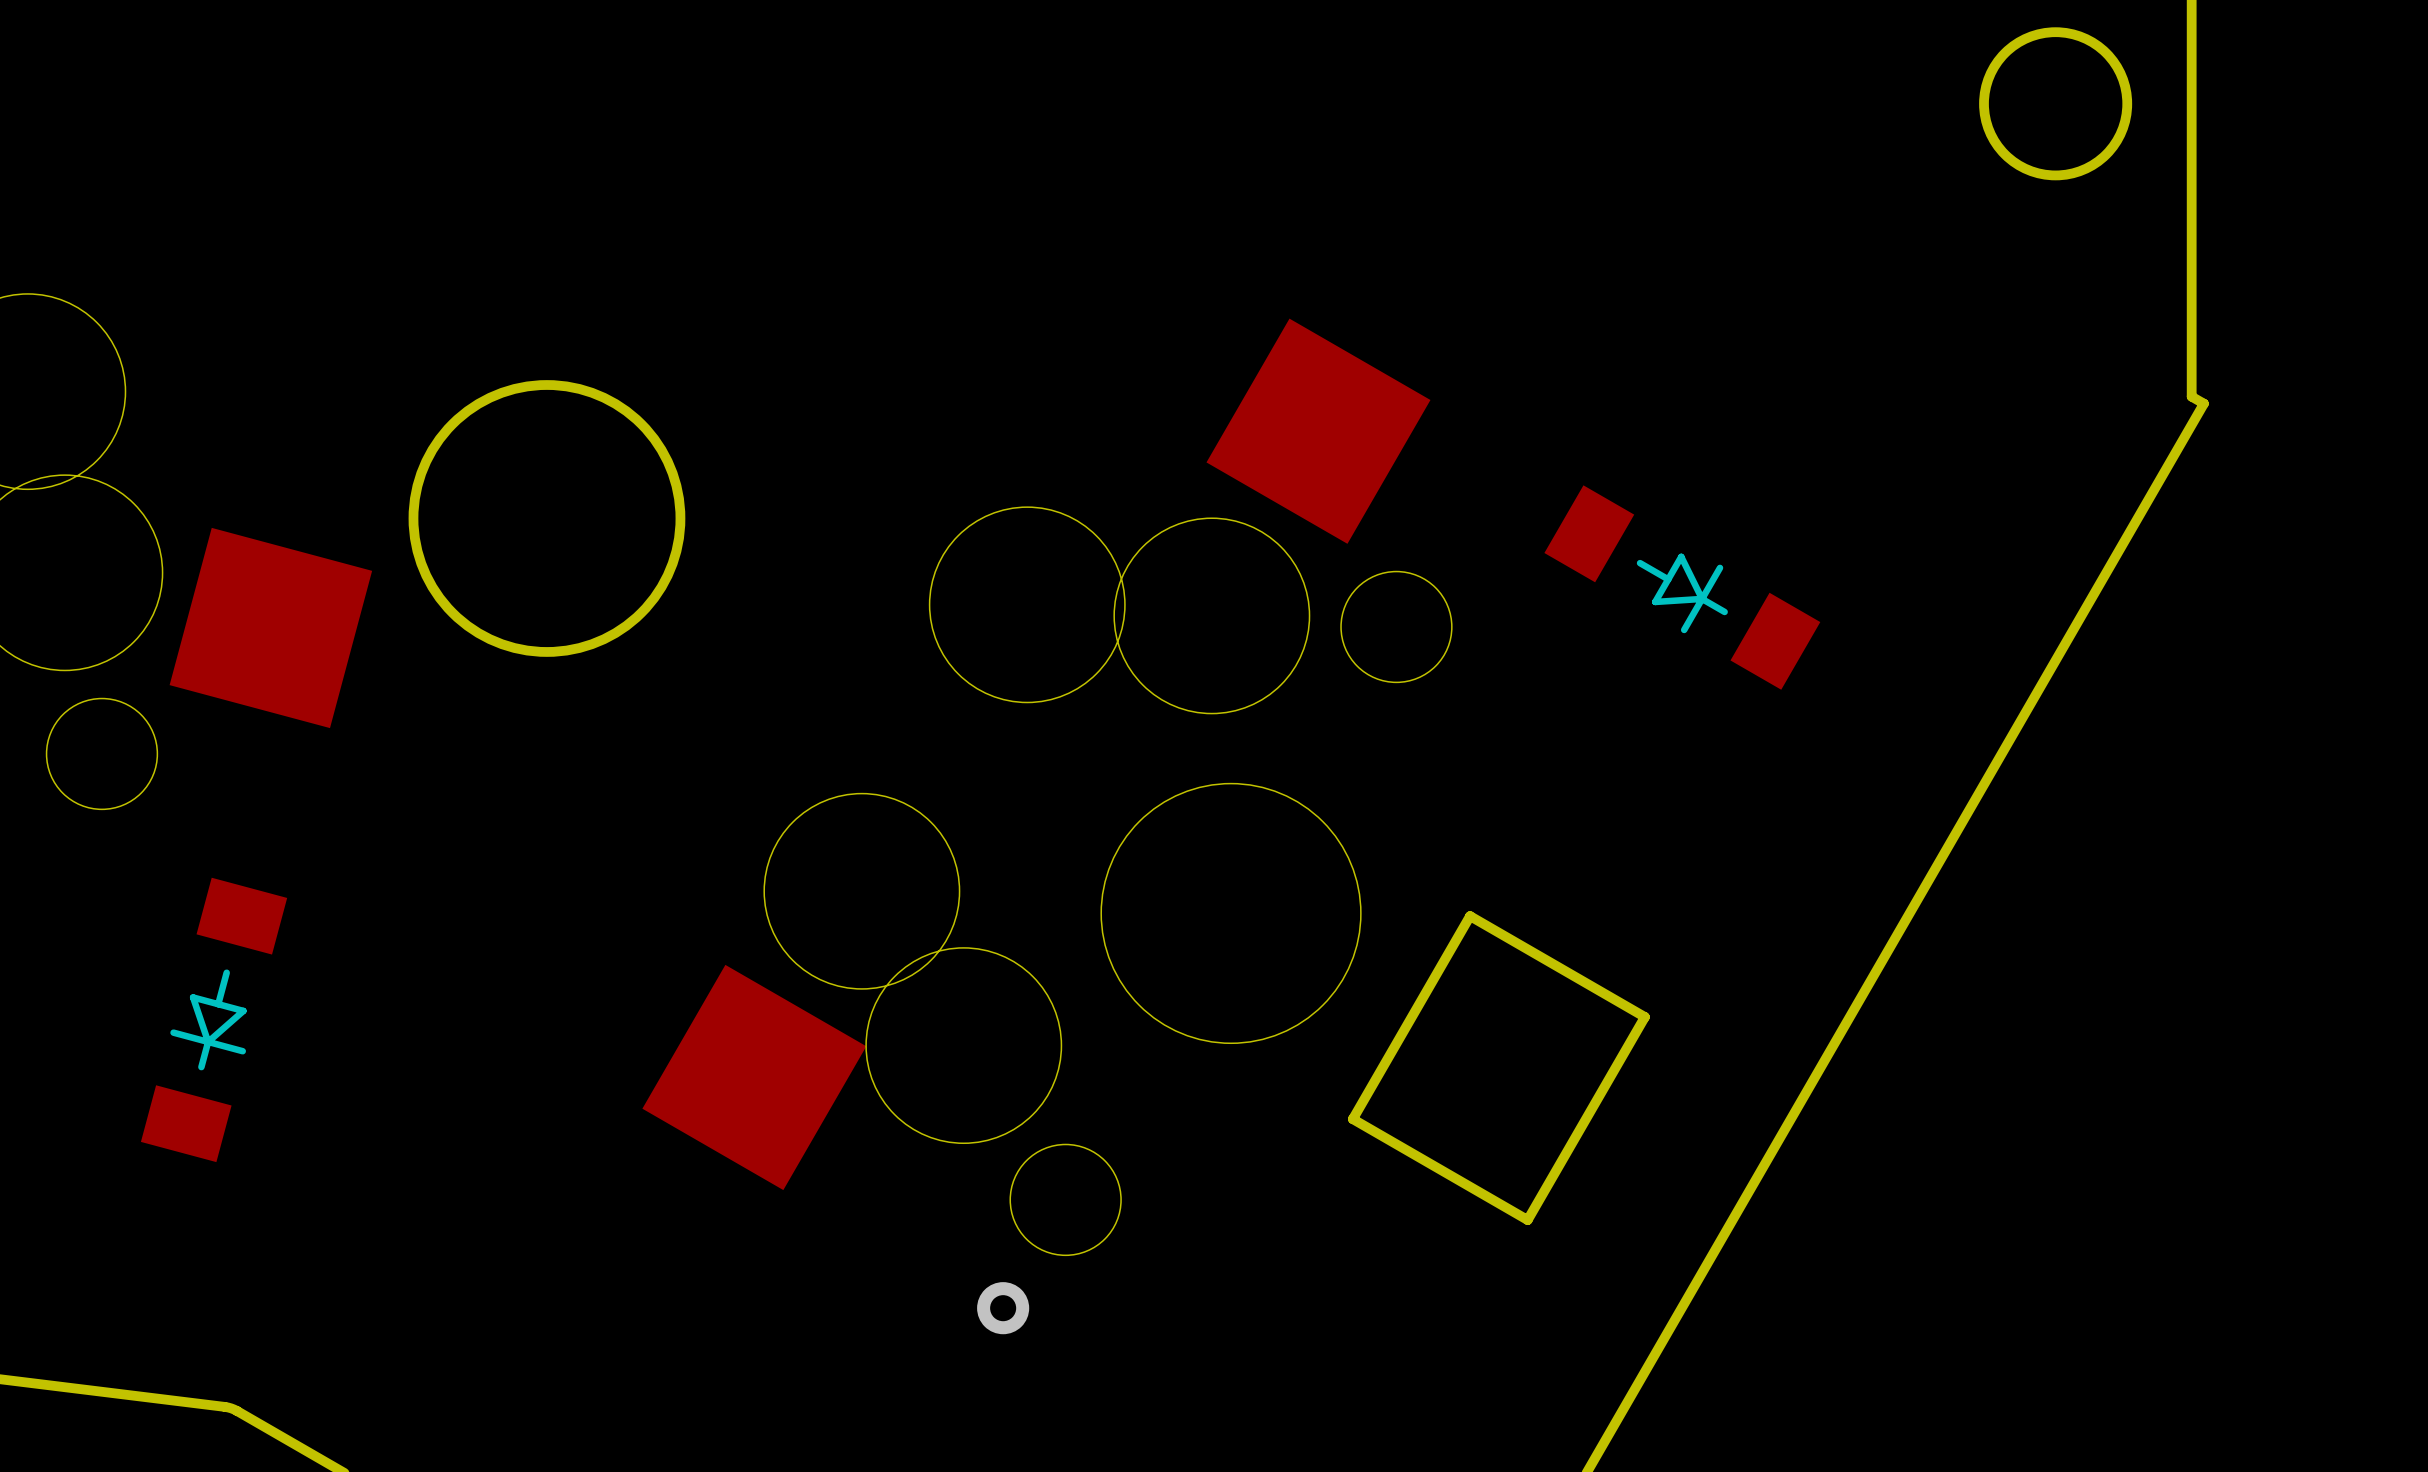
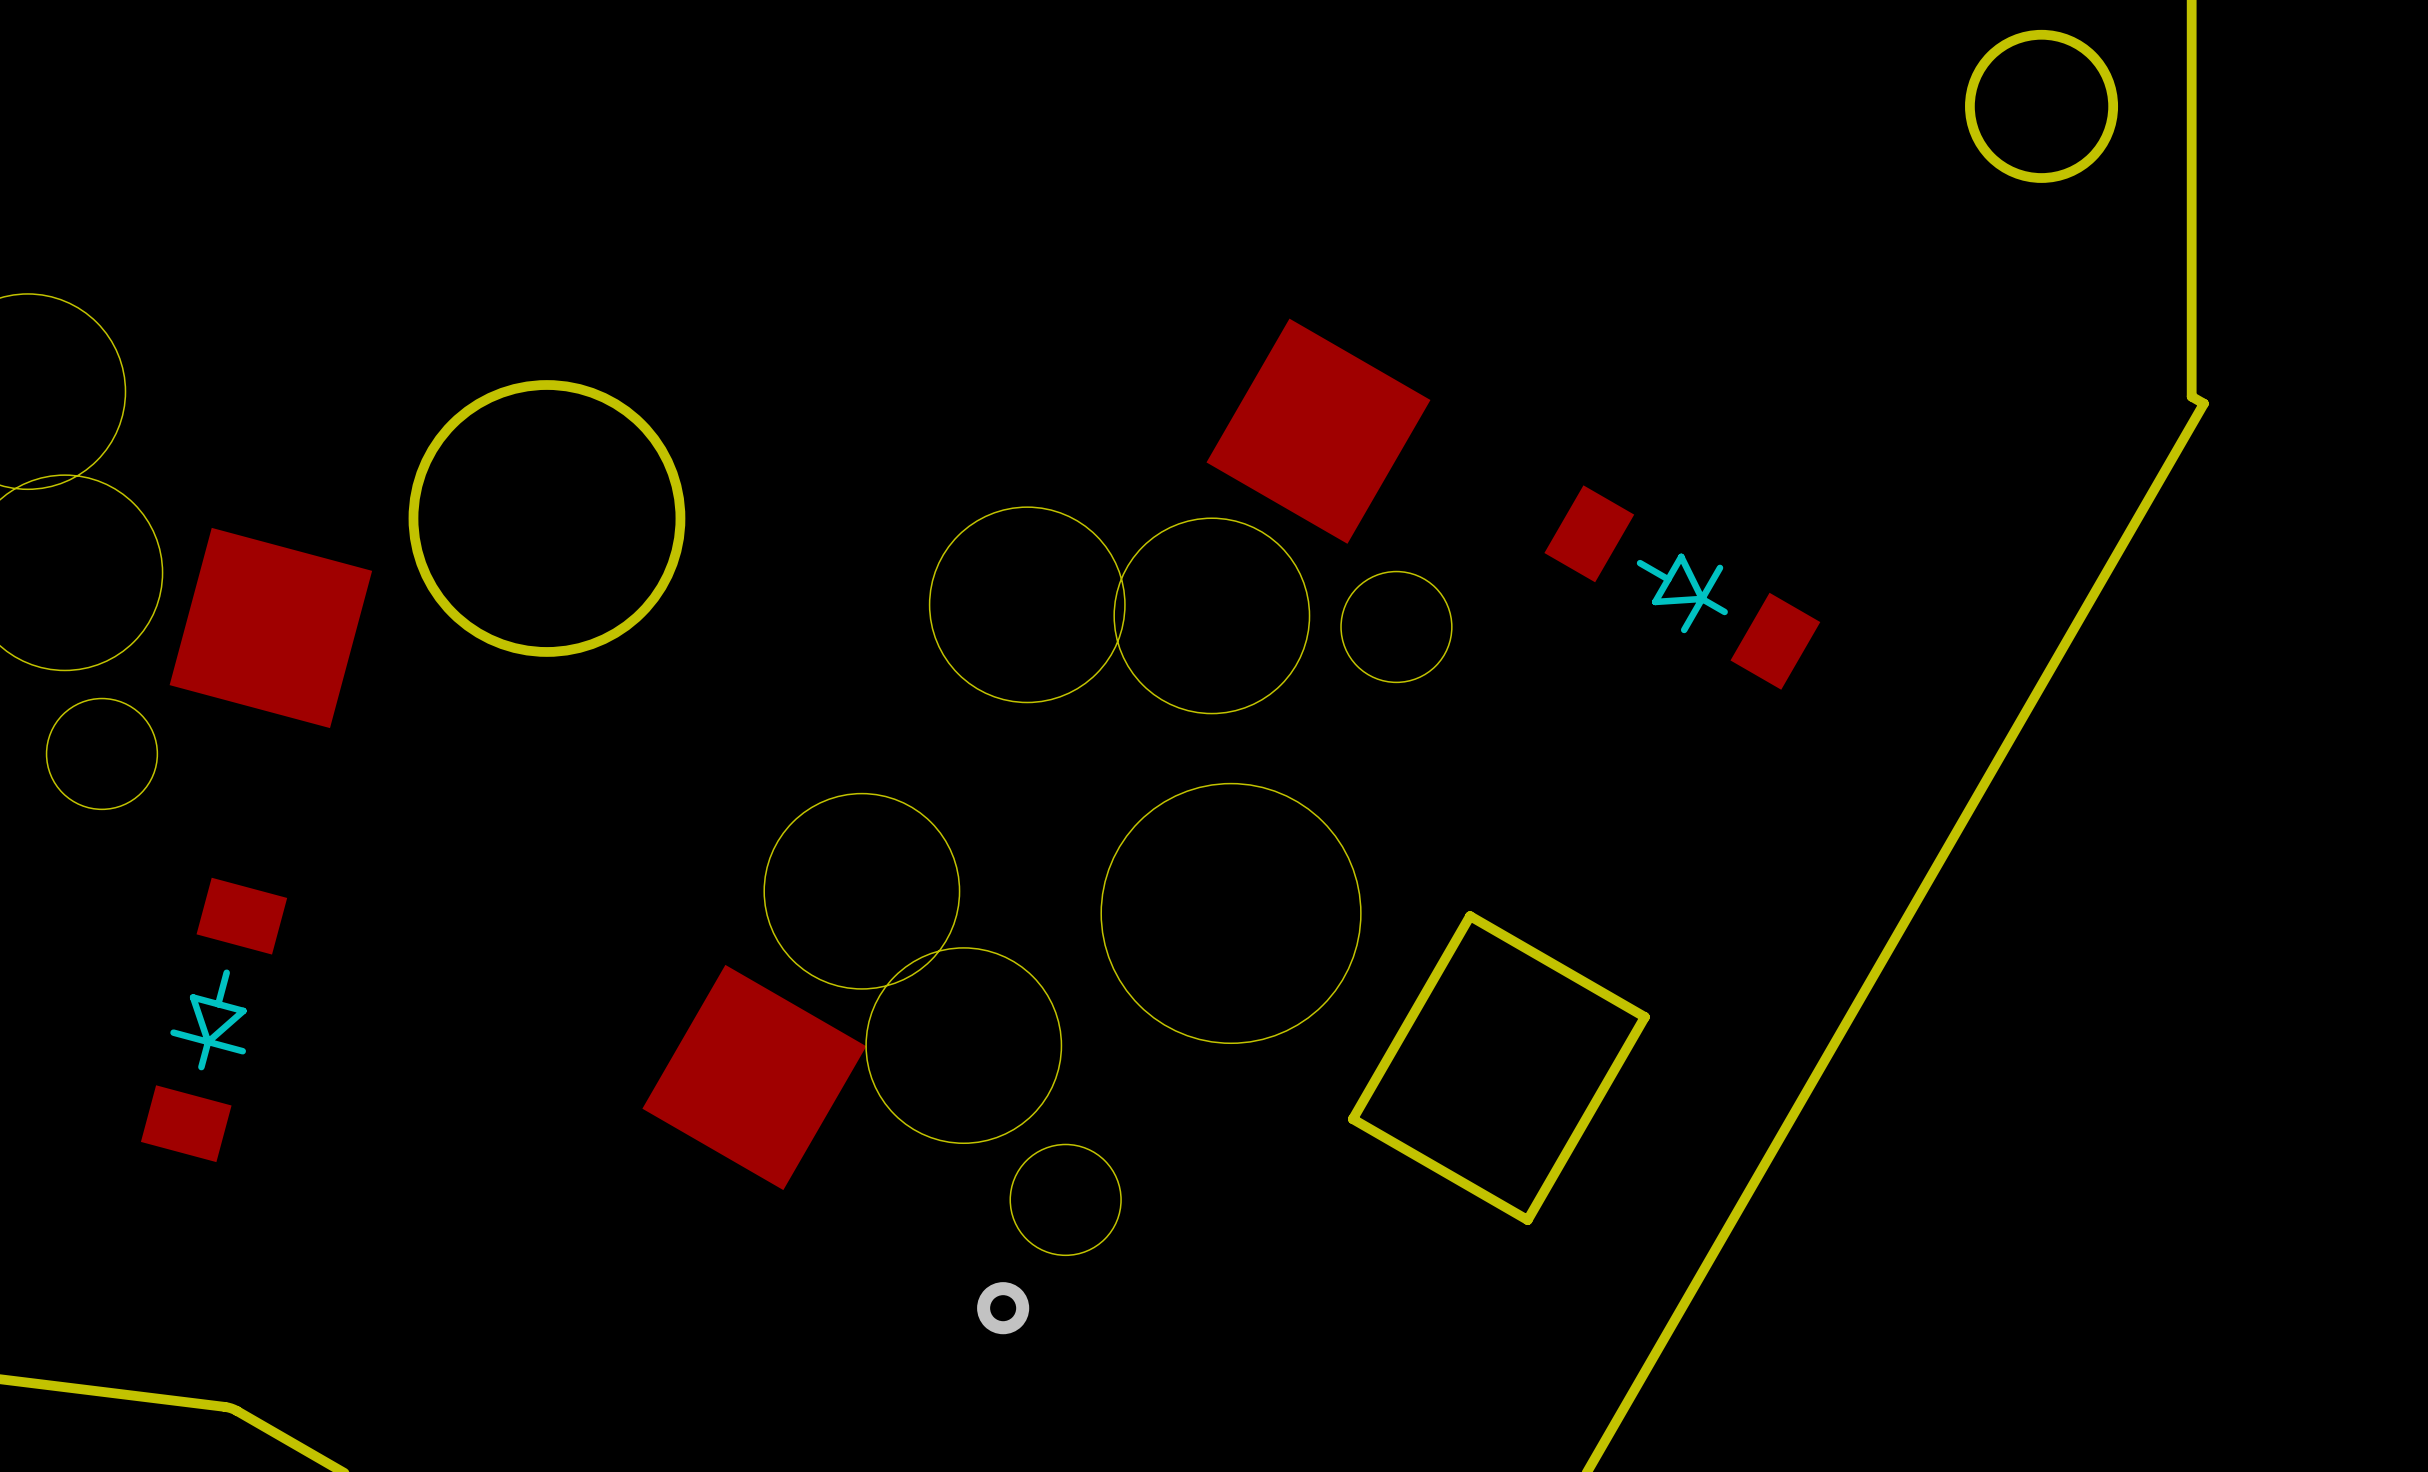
round board edge position: (2055, 103) -> (2041, 106)

